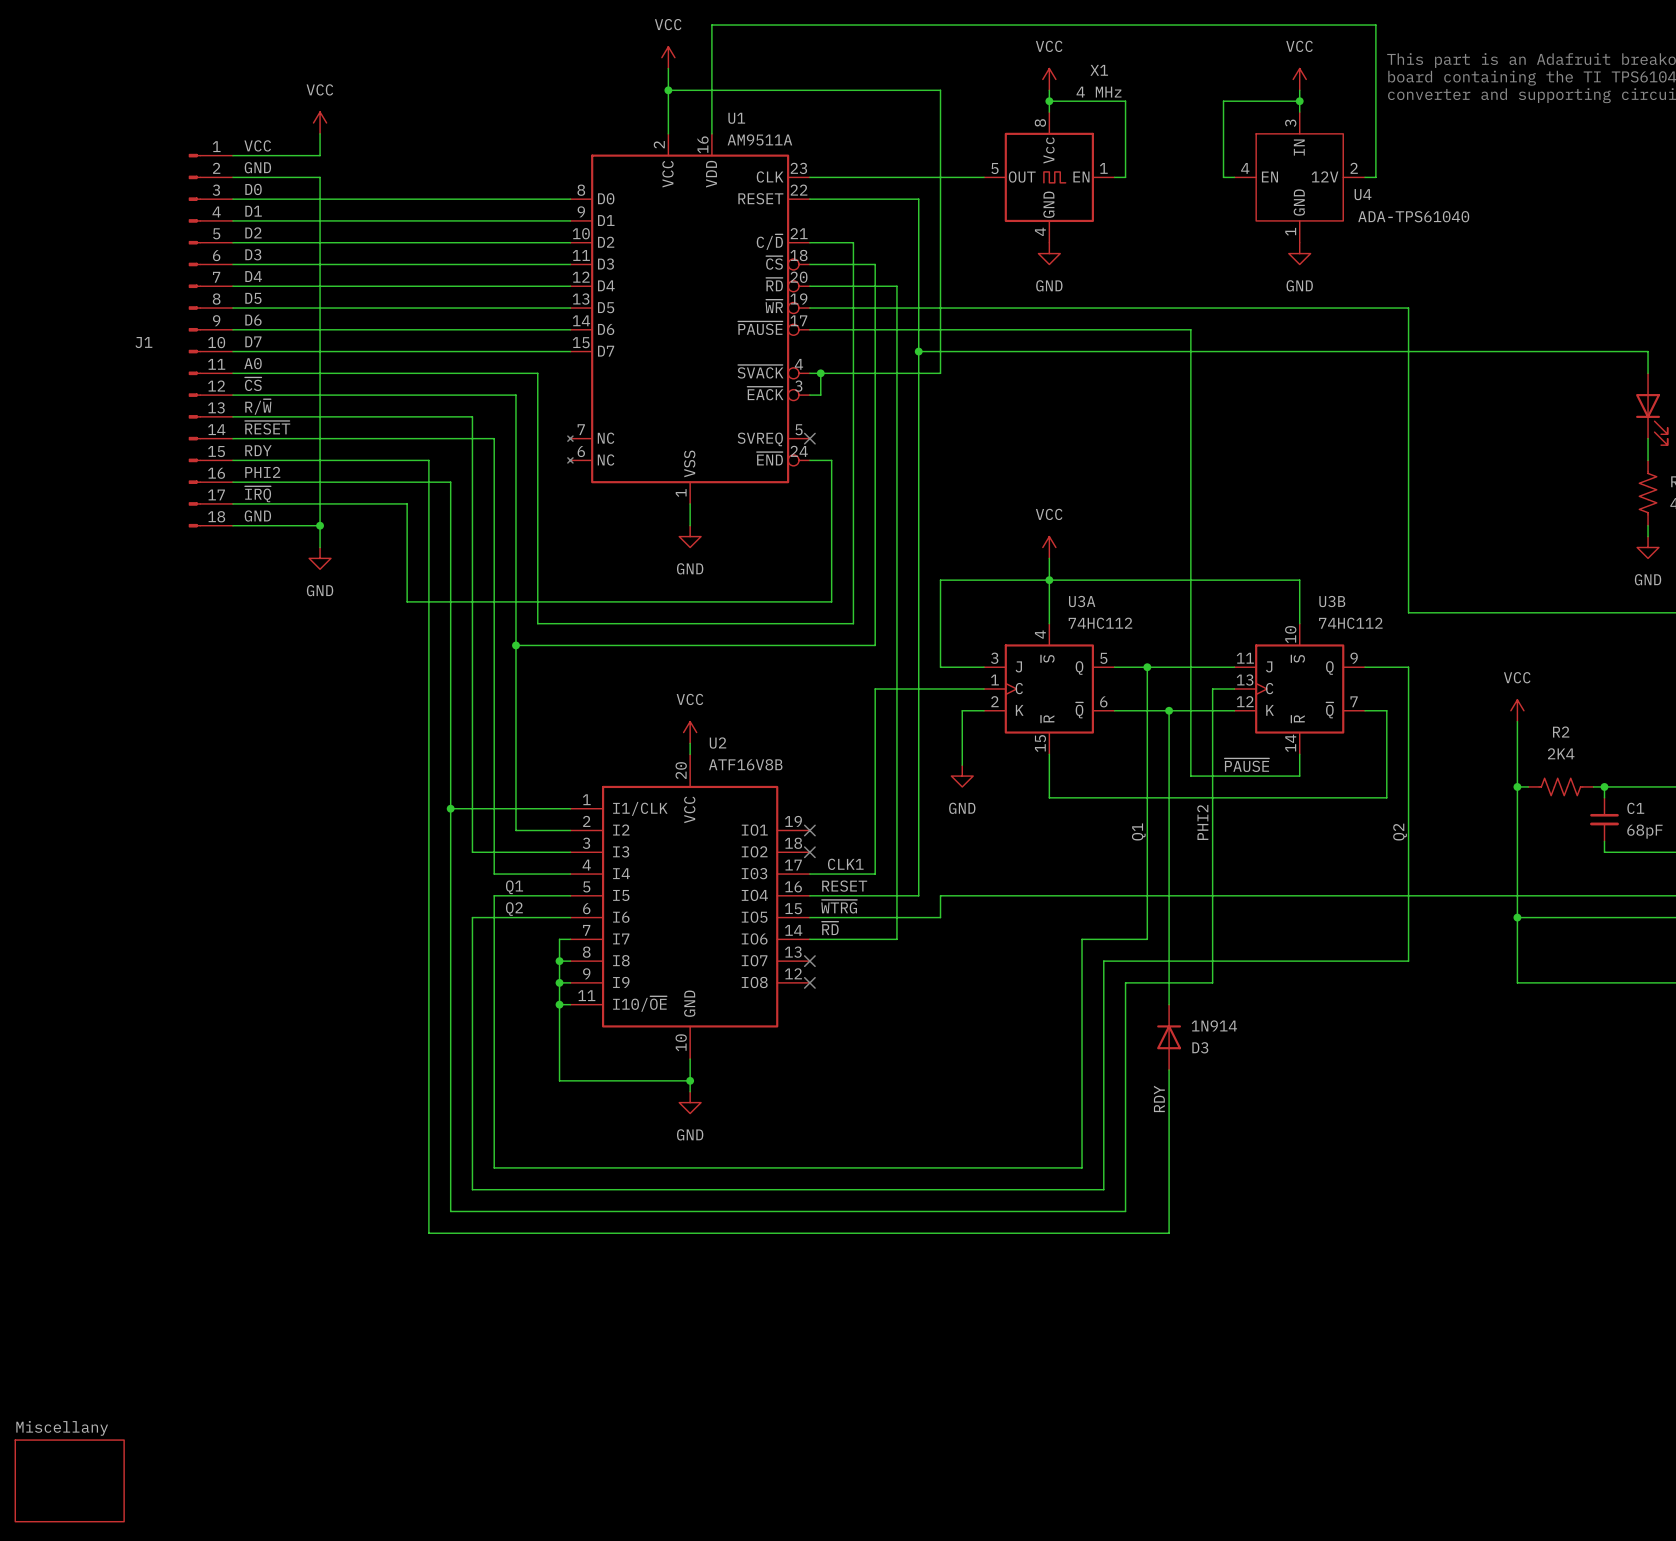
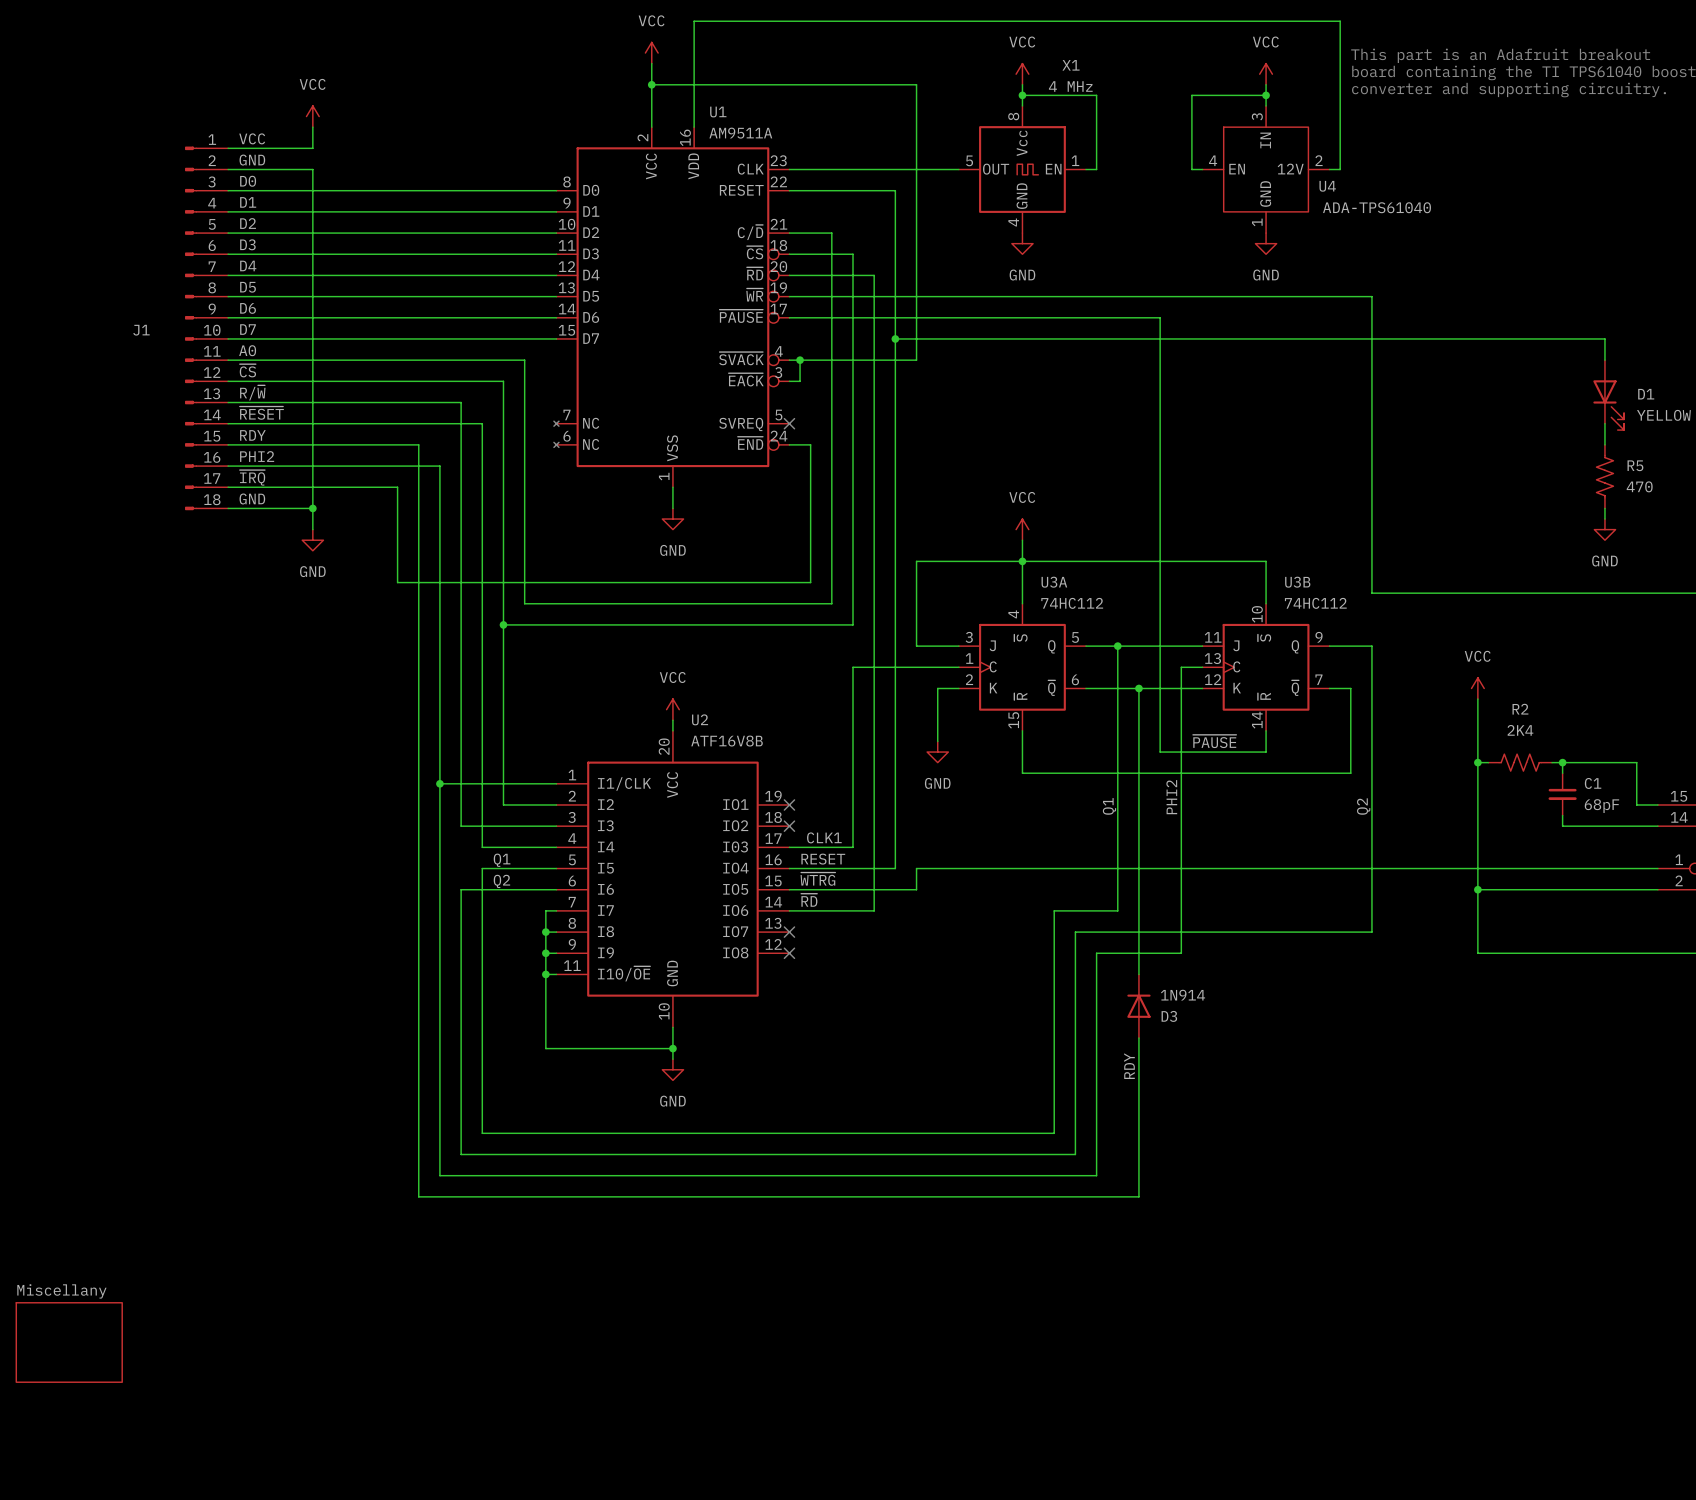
sheet Miscellany position: (69, 1480) -> (69, 1342)

